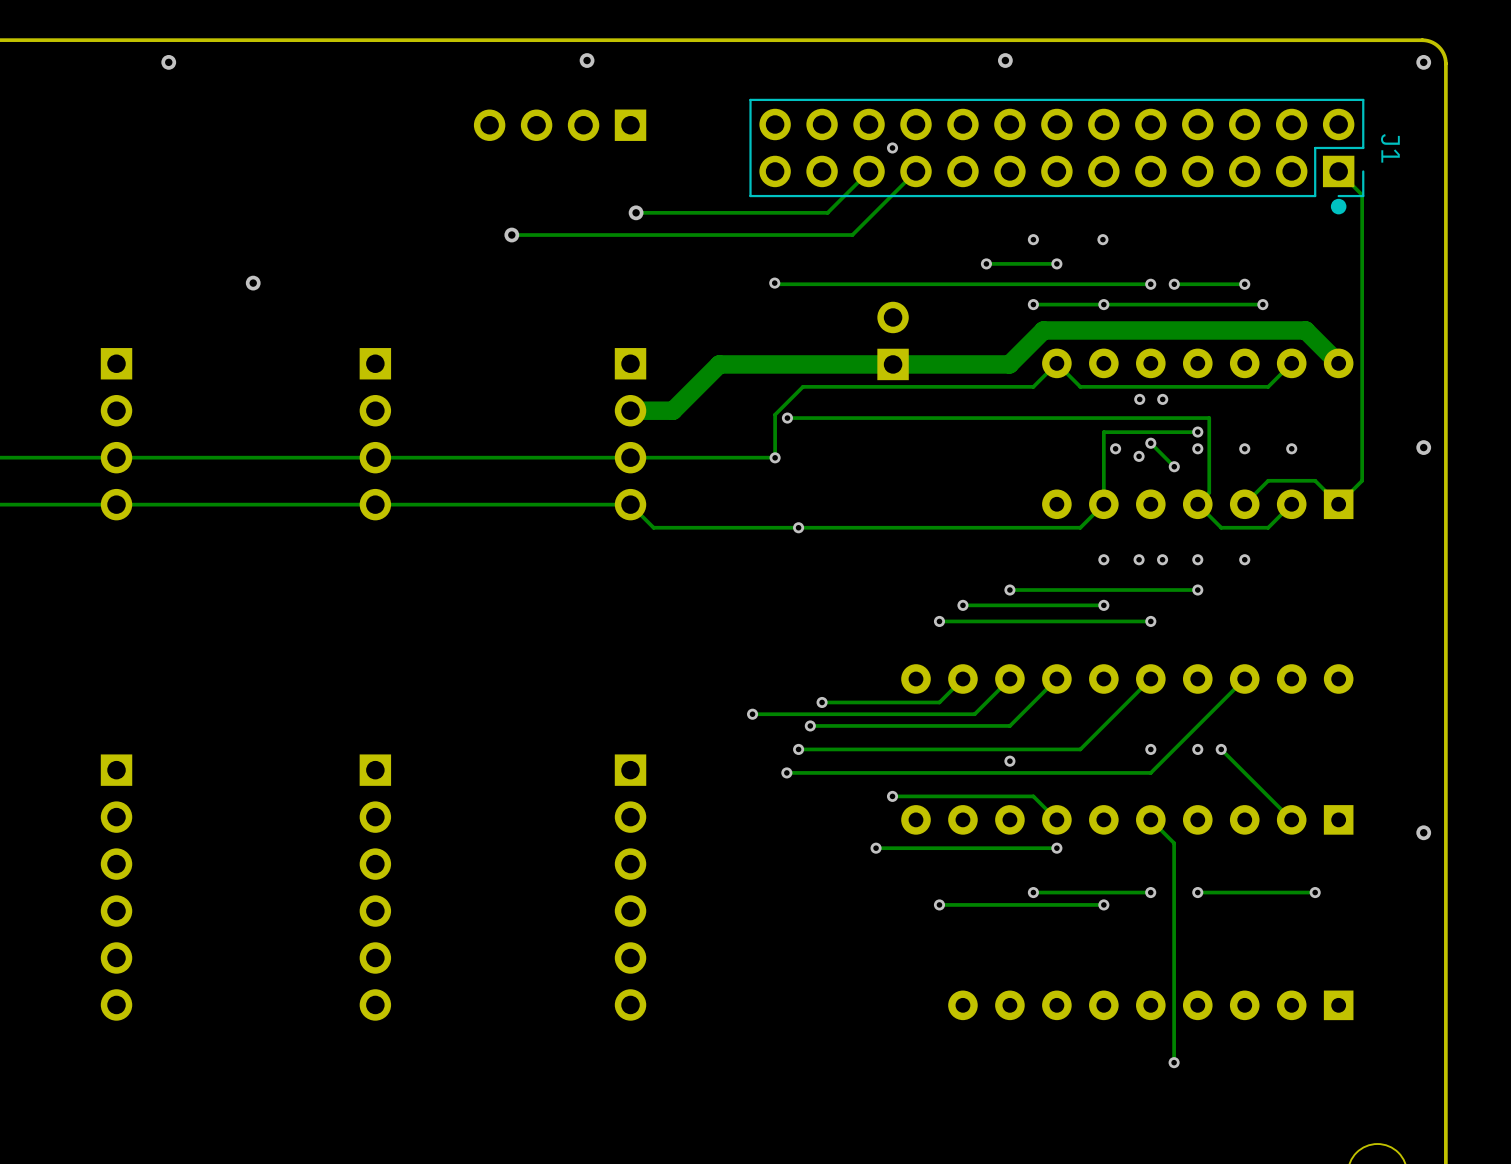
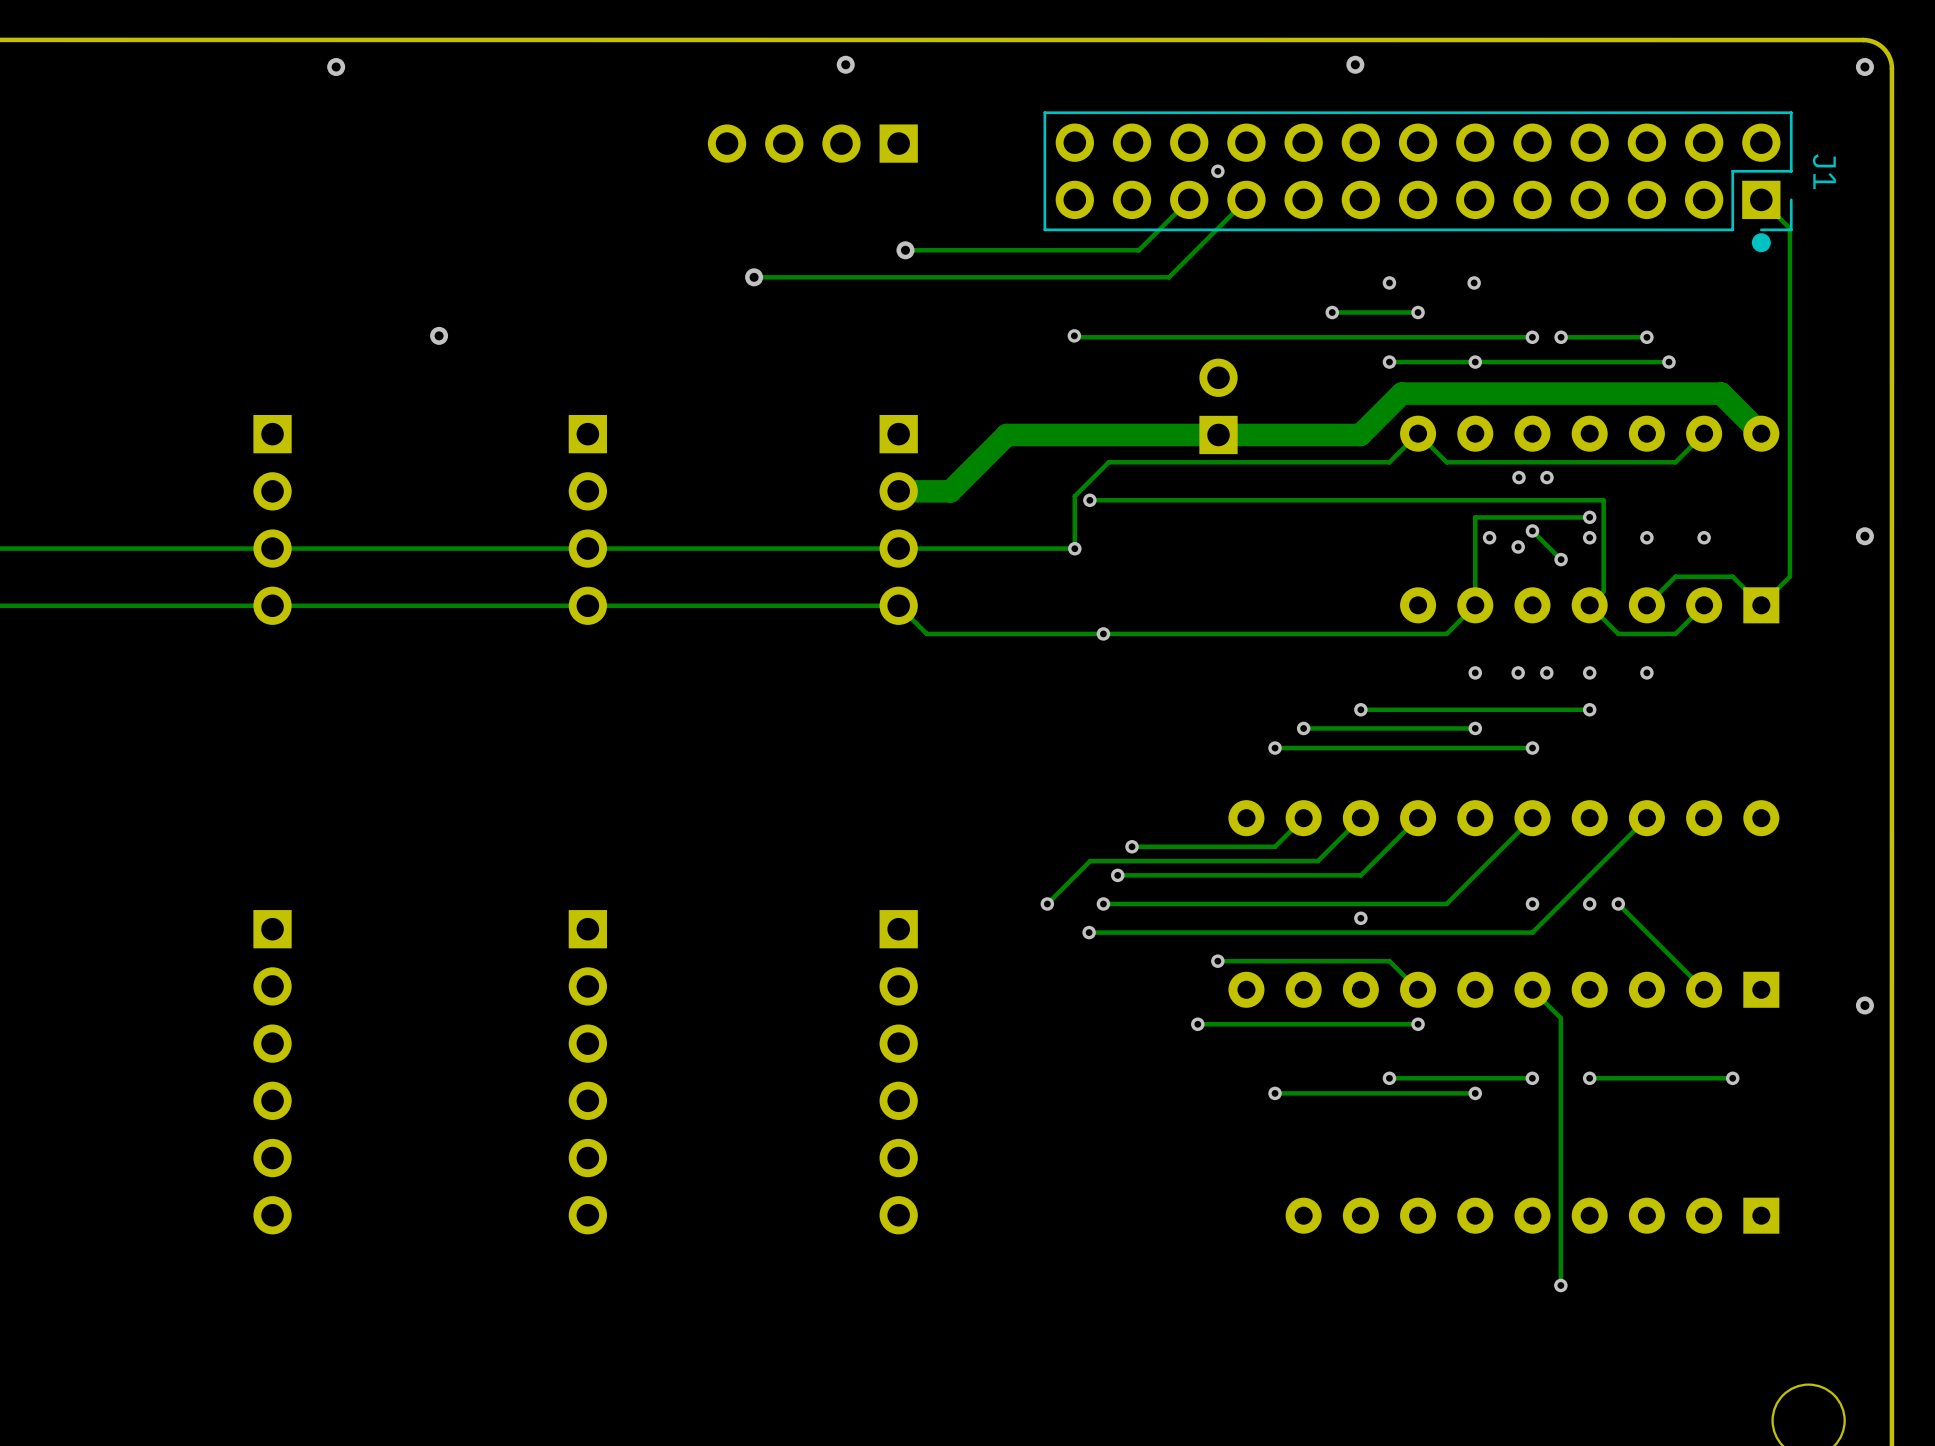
via position: (752, 714) -> (1047, 903)
track: (787, 714) (752, 714) -> (1090, 861) (1047, 903)

